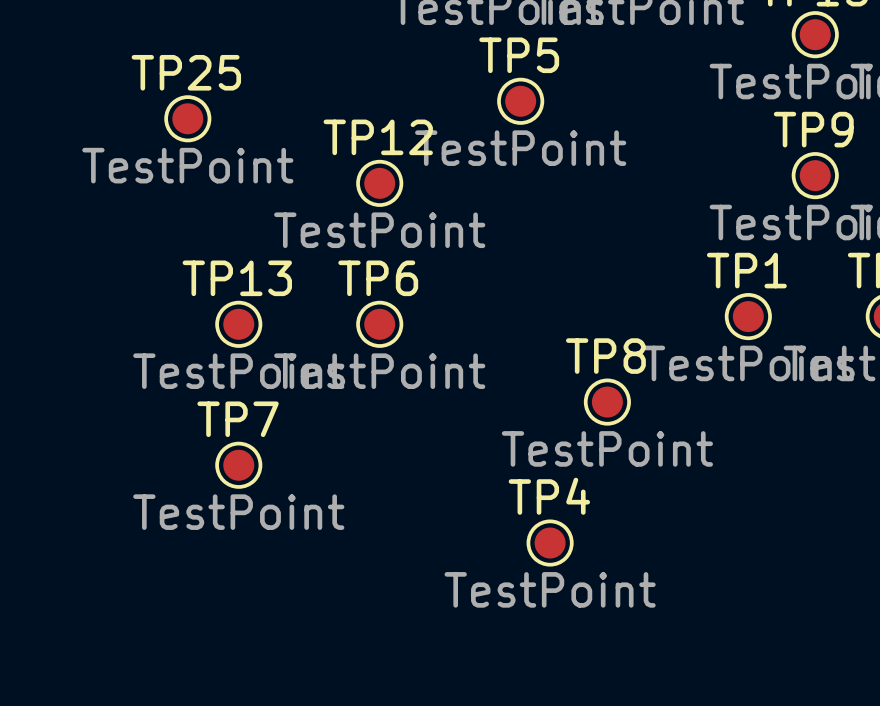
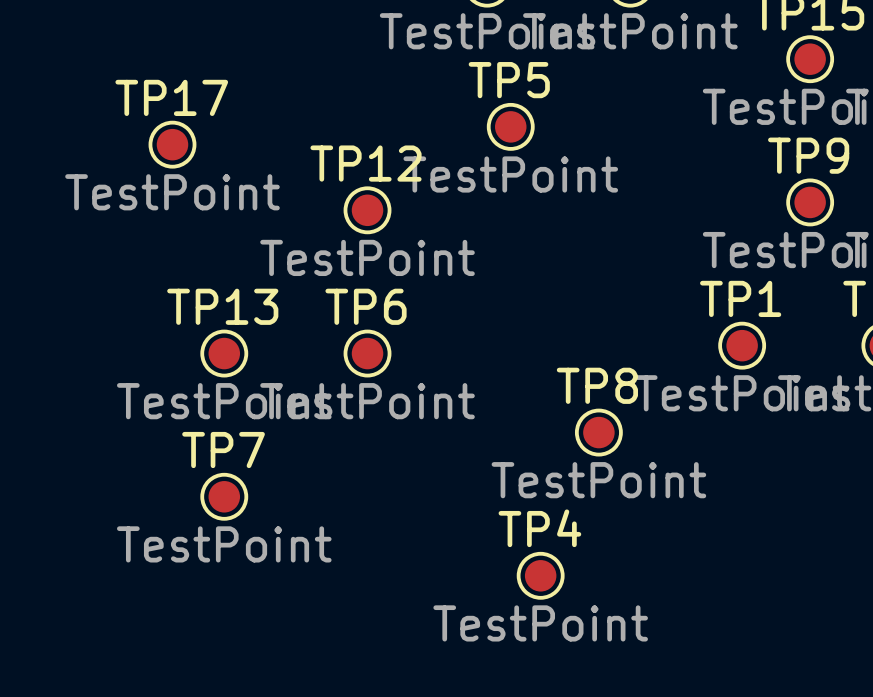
TP25 name: TP25 (186, 72) -> TP17 (171, 97)

